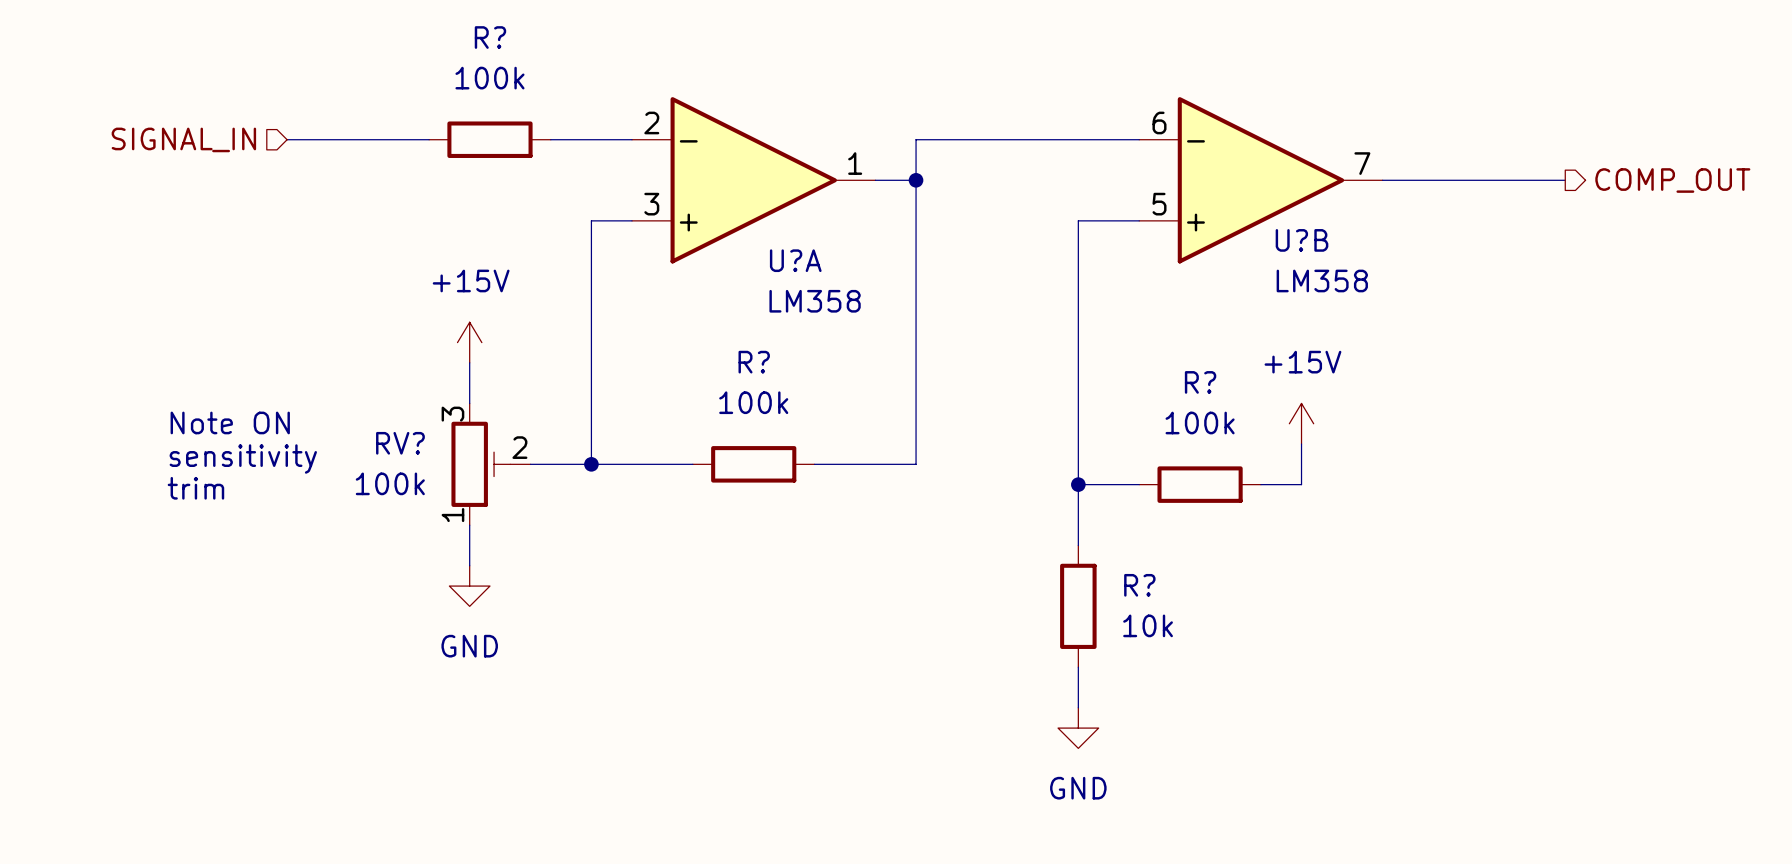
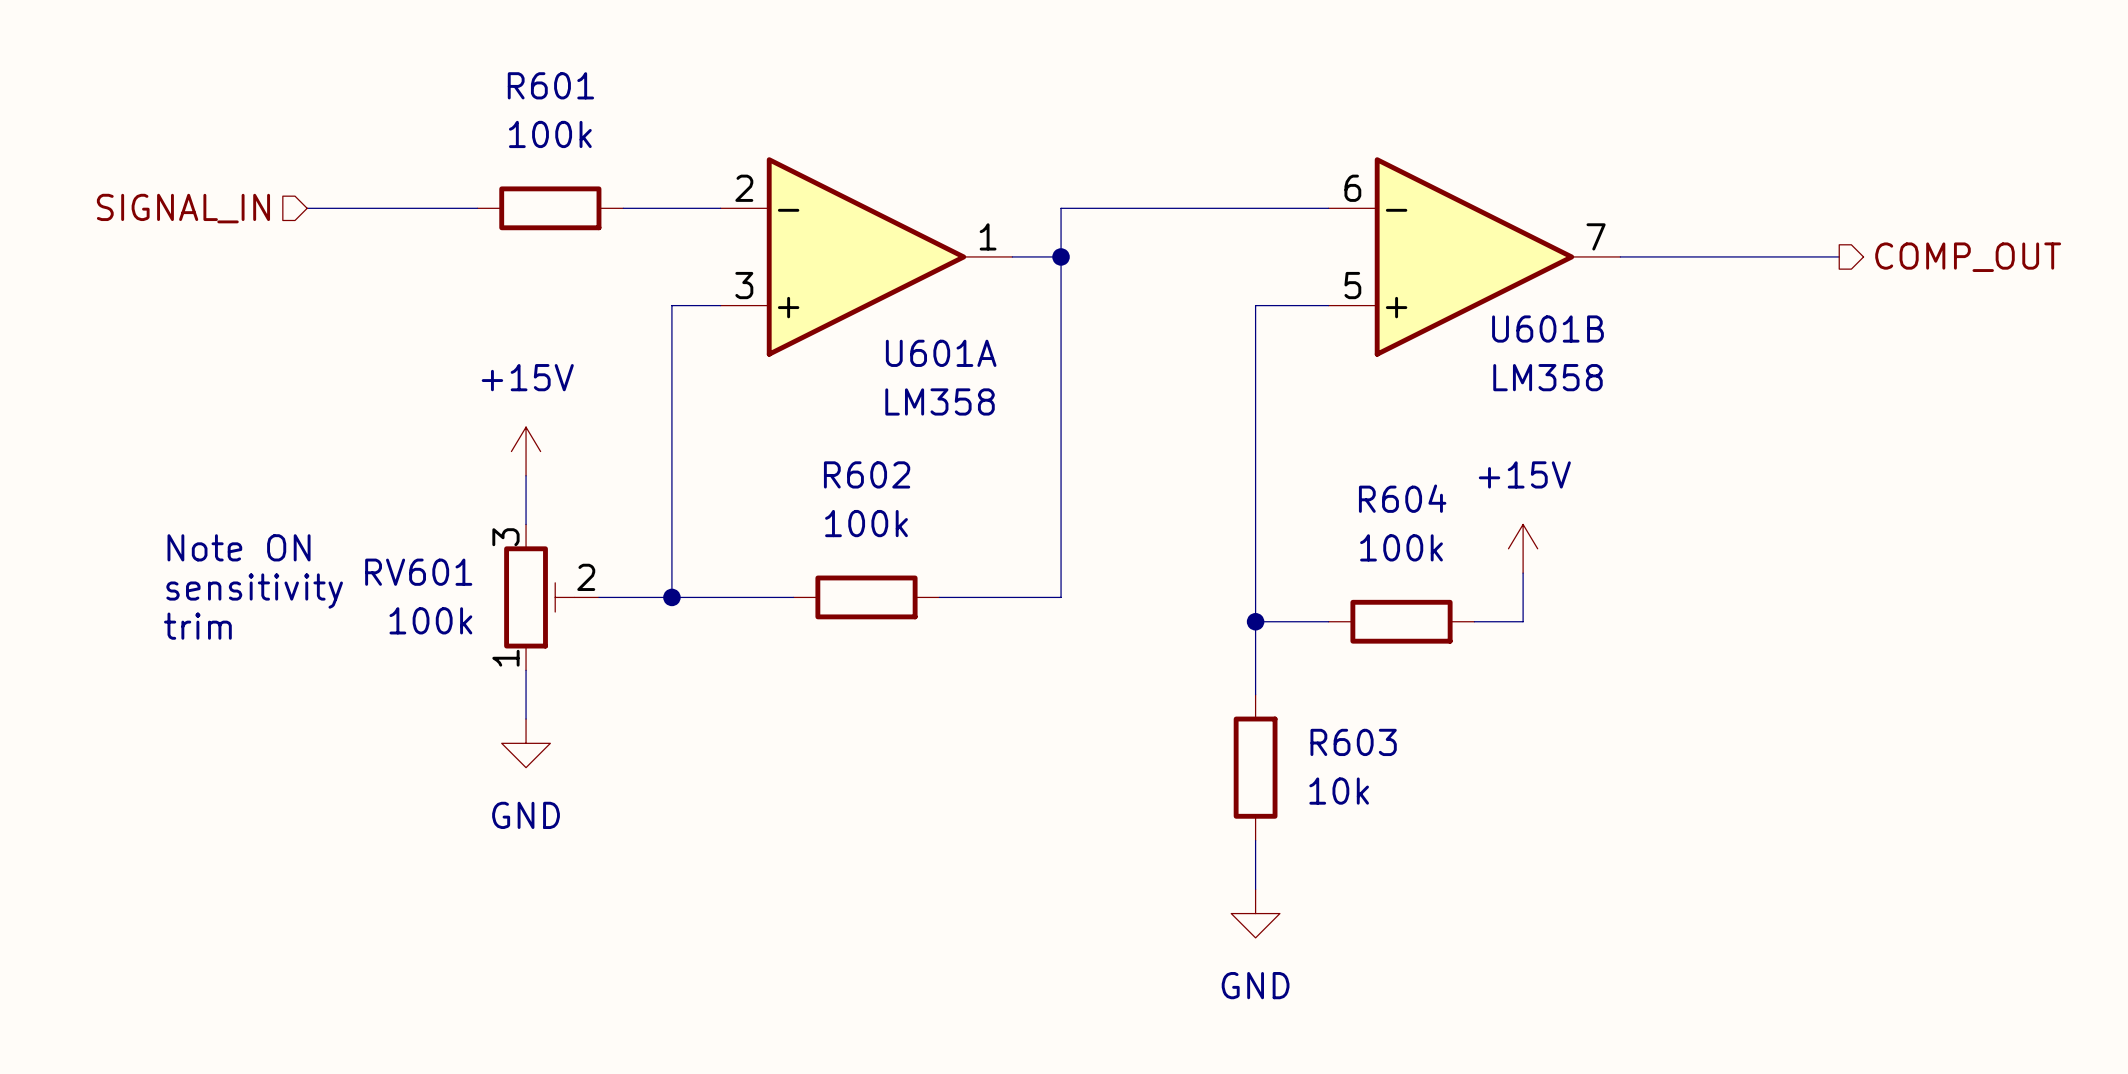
R? name: R? (490, 37) -> R601 (550, 85)
U?B name: U?B (1302, 240) -> U601B (1547, 329)
U?A name: U?A (795, 260) -> U601A (941, 353)
R? name: R? (754, 362) -> R602 (867, 474)
R? name: R? (1200, 382) -> R604 (1402, 498)
RV? name: RV? (400, 443) -> RV601 (418, 572)
R? name: R? (1139, 585) -> R603 (1353, 742)

